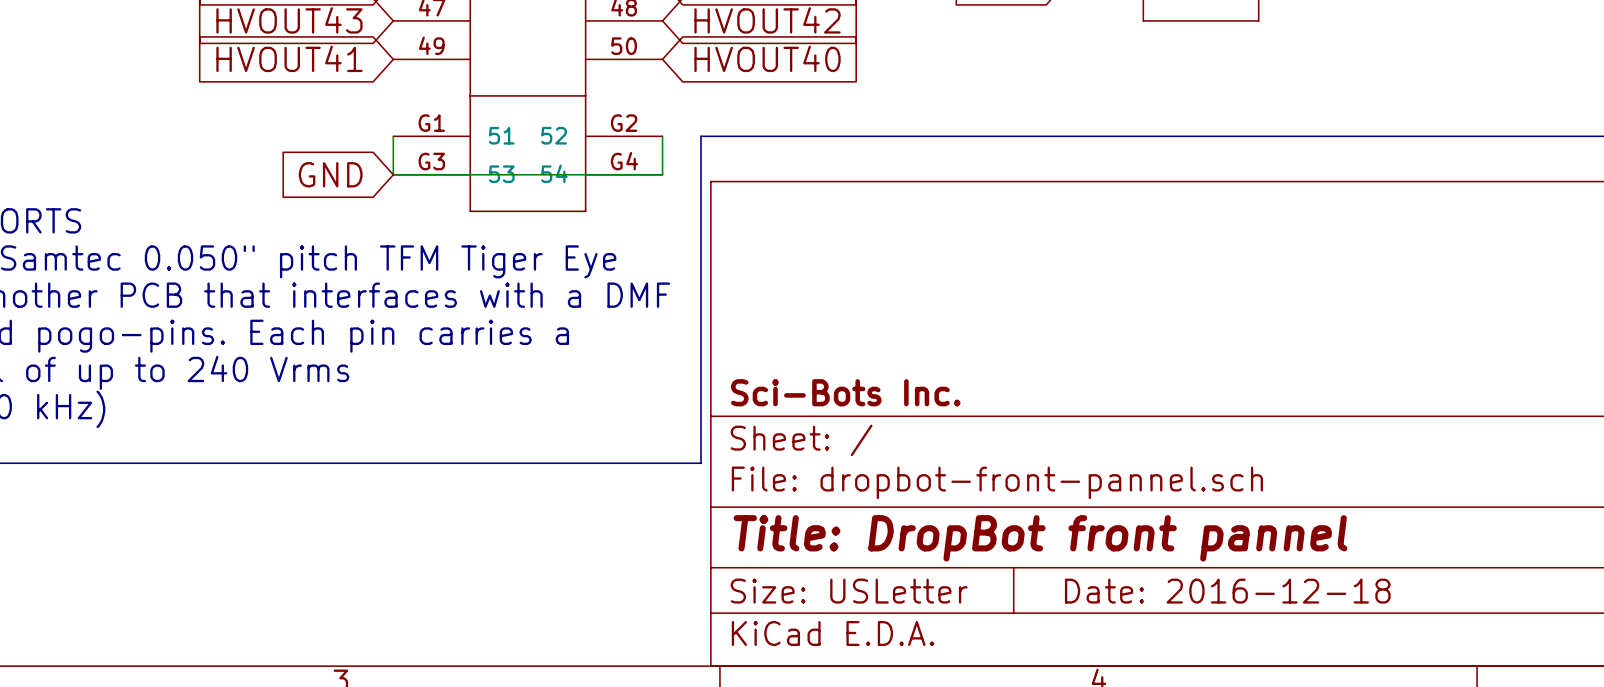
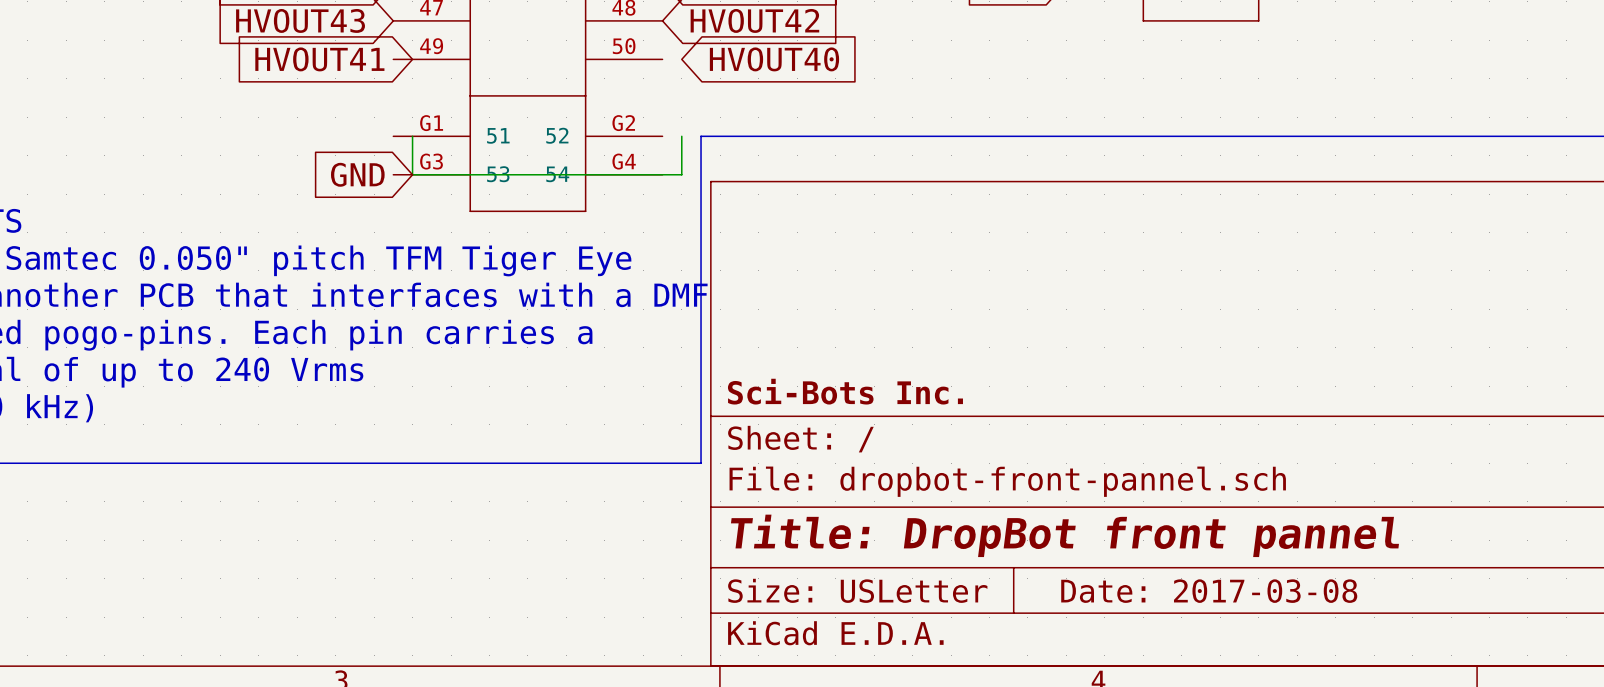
global label position: HVOUT41 (289, 58) -> HVOUT41 (319, 59)
global label position: HVOUT40 (767, 58) -> HVOUT40 (774, 59)
wire: (393, 136) (393, 174) (412, 174) -> (412, 136) (412, 174)
wire: (662, 136) (662, 174) -> (681, 136) (681, 174) (662, 174)
global label position: GND (330, 174) -> GND (357, 174)
title block: Date: 2016-12-18 (1227, 591) -> Date: 2017-03-08 (1209, 591)

